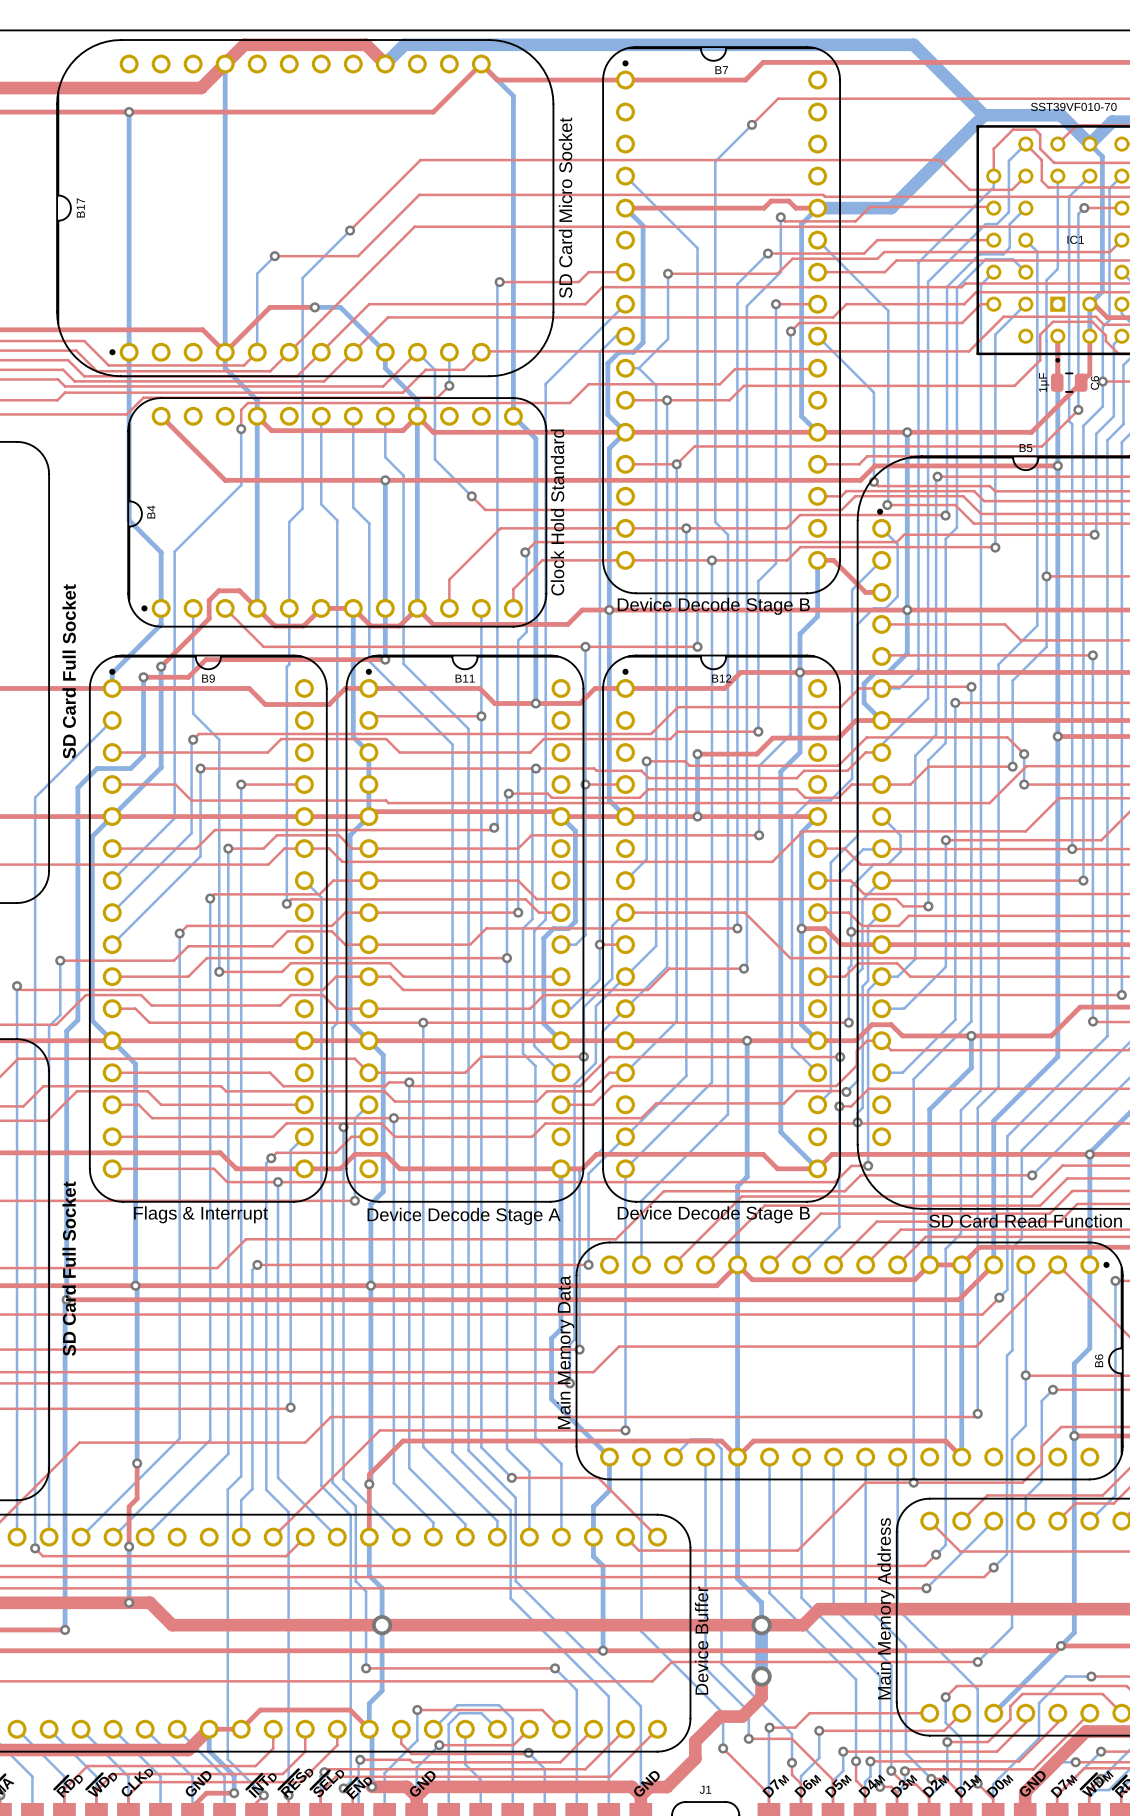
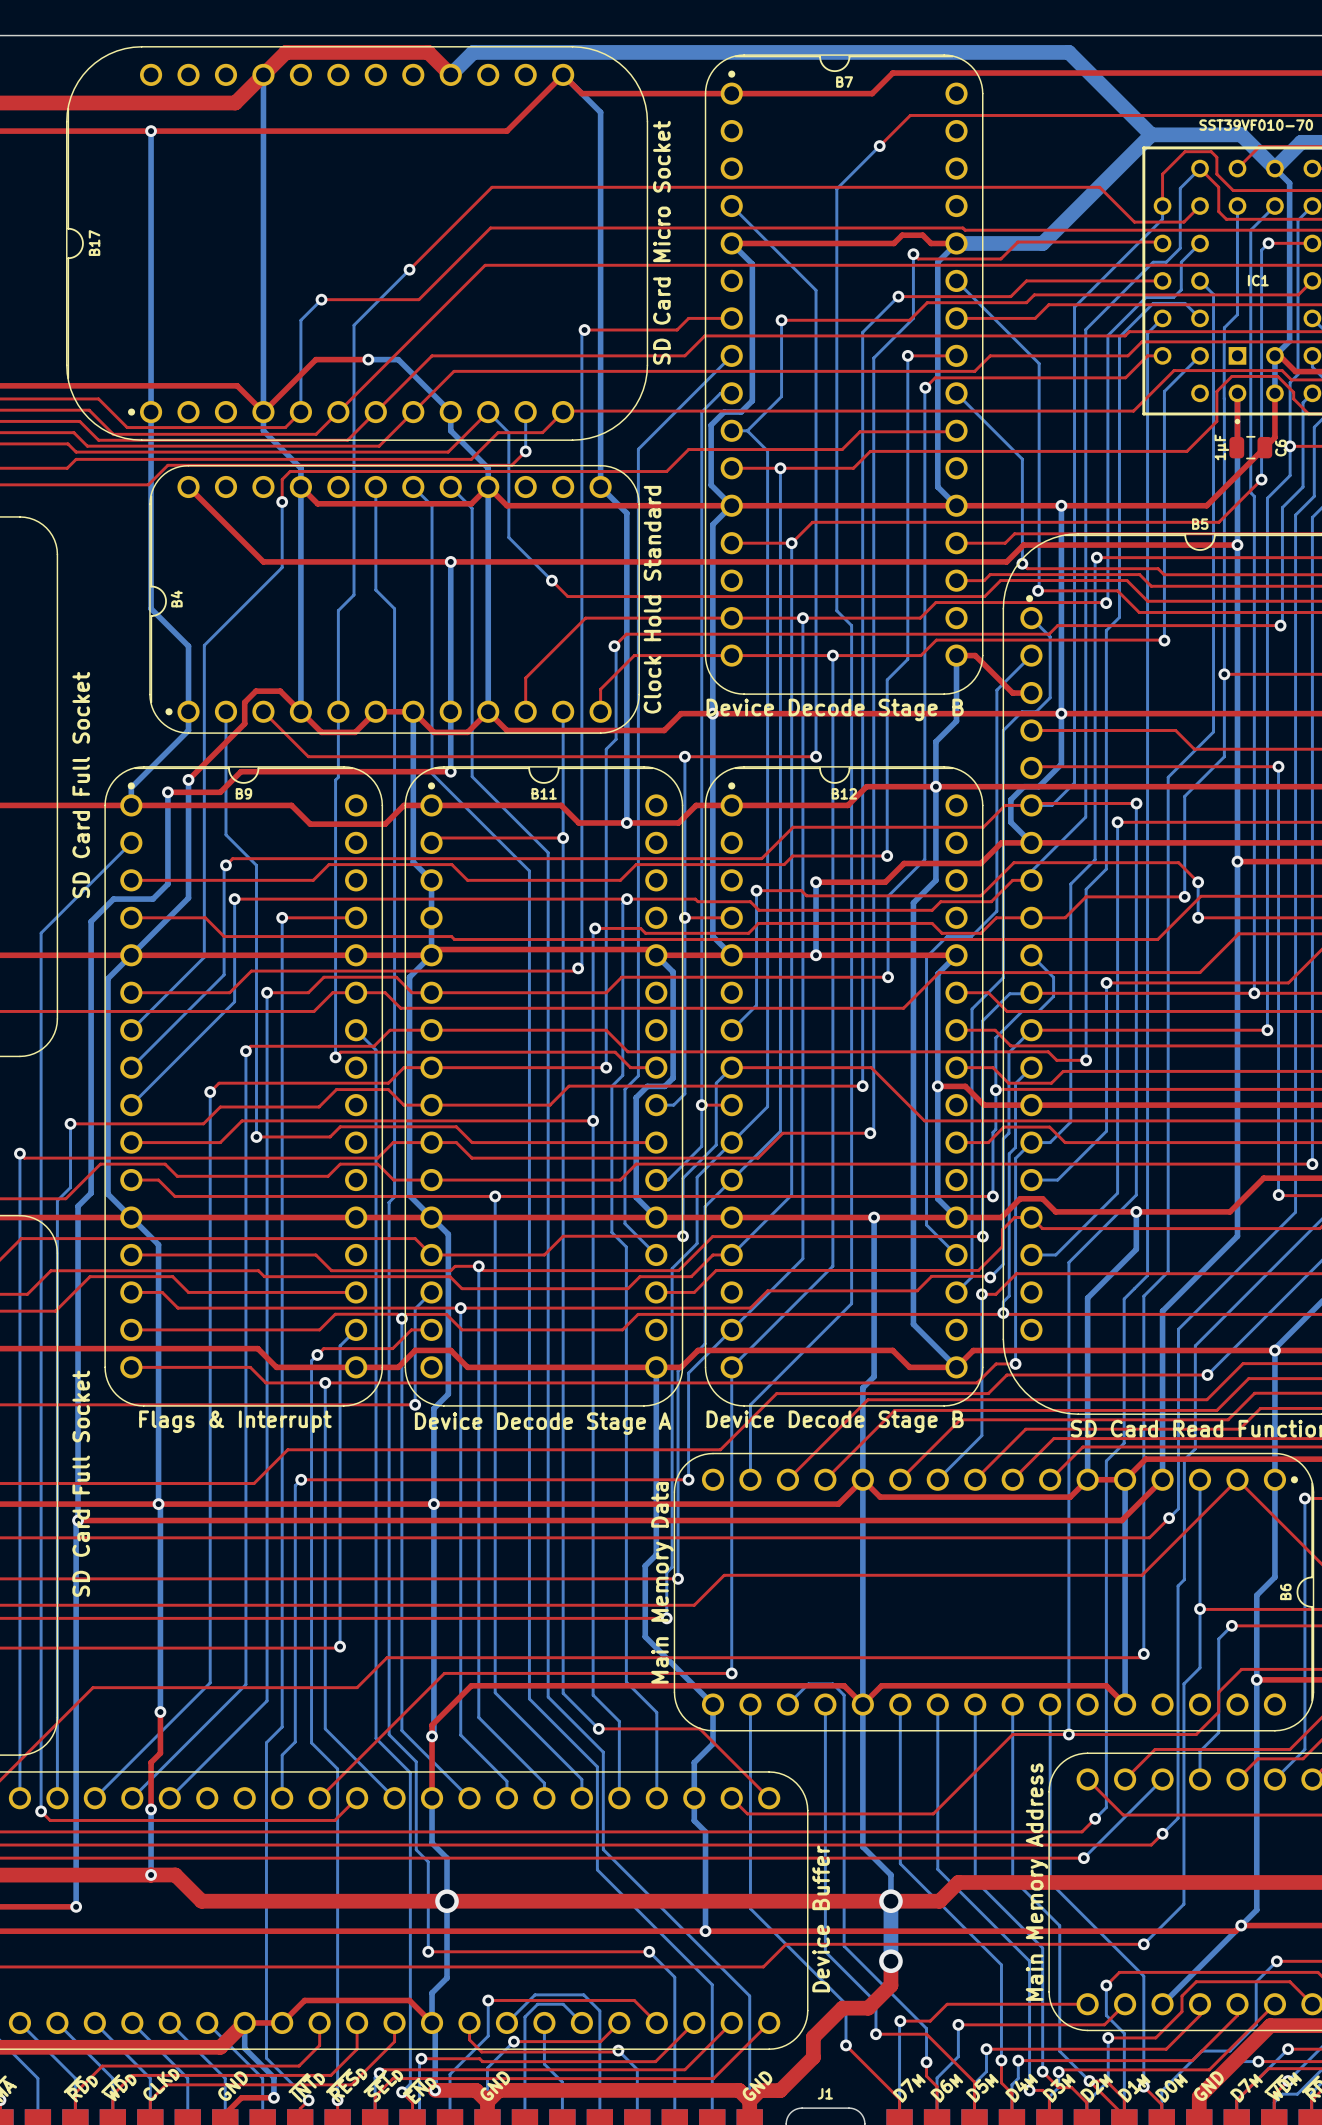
bottom track: (353, 416) (353, 507) (369, 523) -> (413, 486) (432, 505) (432, 612)
bottom track: (385, 416) (385, 457) (403, 475) -> (450, 486) (472, 508) (472, 556)
bottom track: (1091, 1676) (1065, 1676) (1039, 1703) (1039, 1738) (993, 1784) (993, 1787) -> (1276, 1961) (1256, 1981) (1256, 2024) (1229, 2051) (1201, 2051) (1161, 2091)
top track: none -> (1093, 2084) (1124, 2115)

